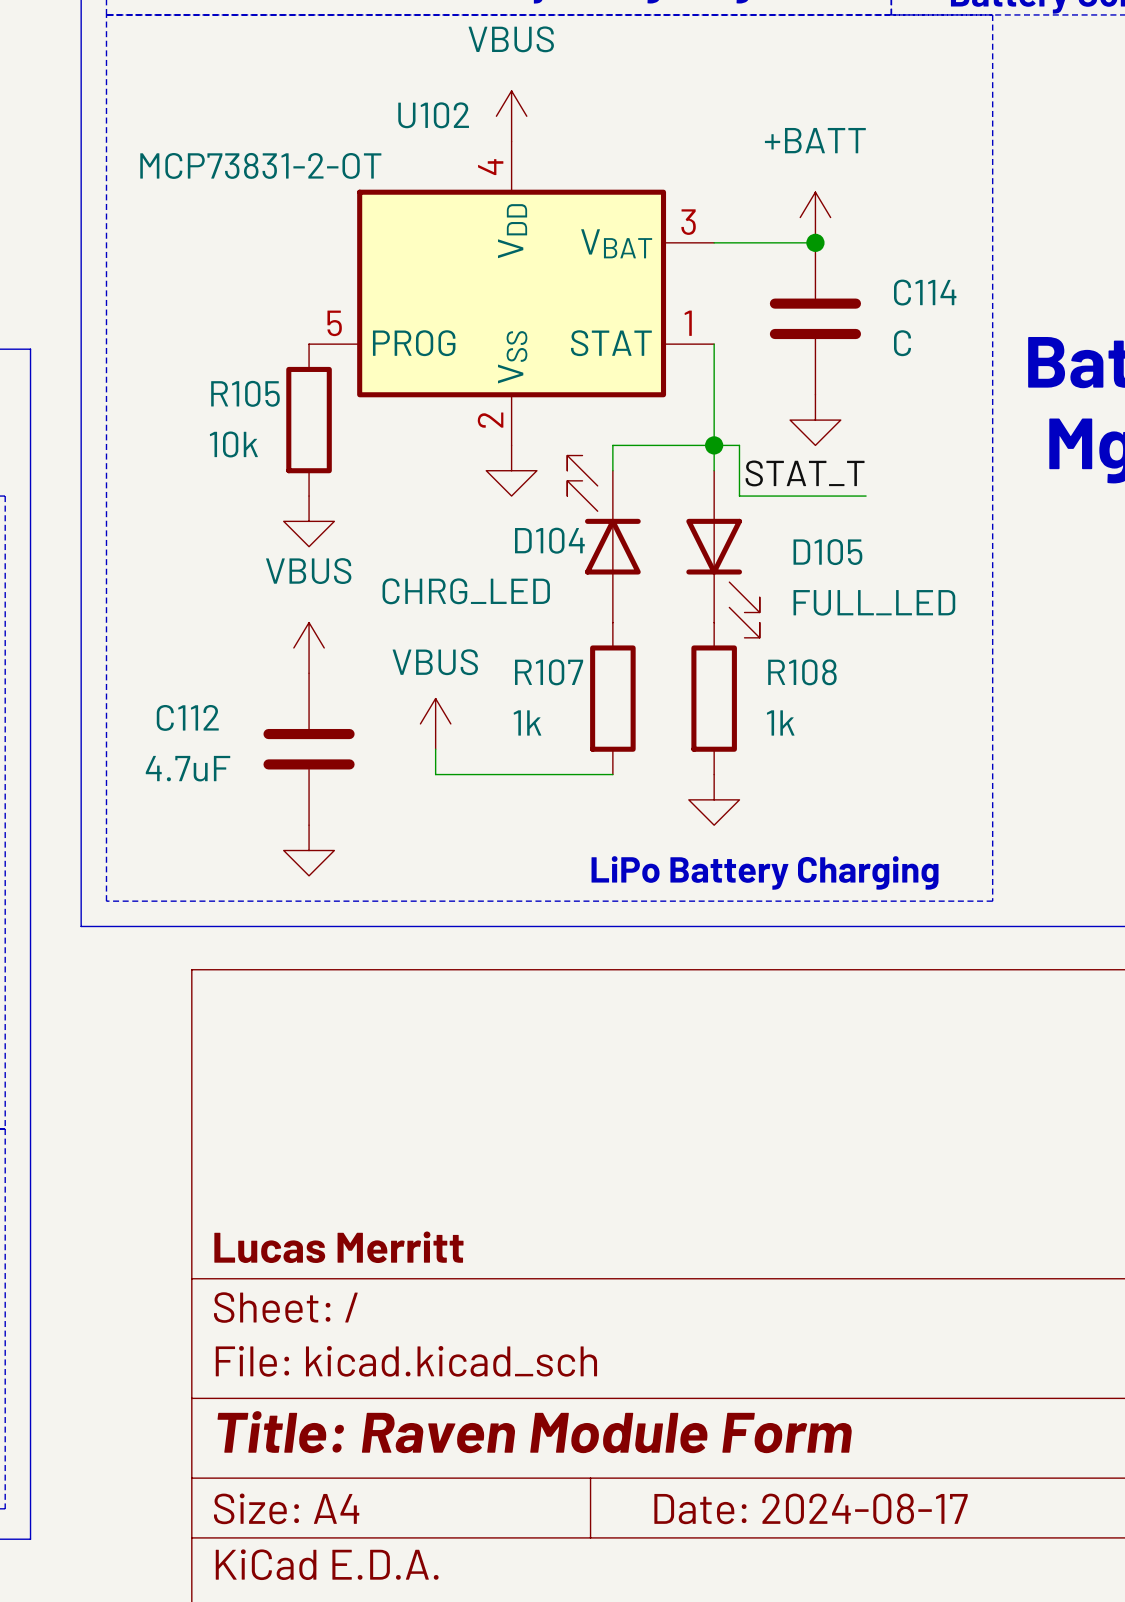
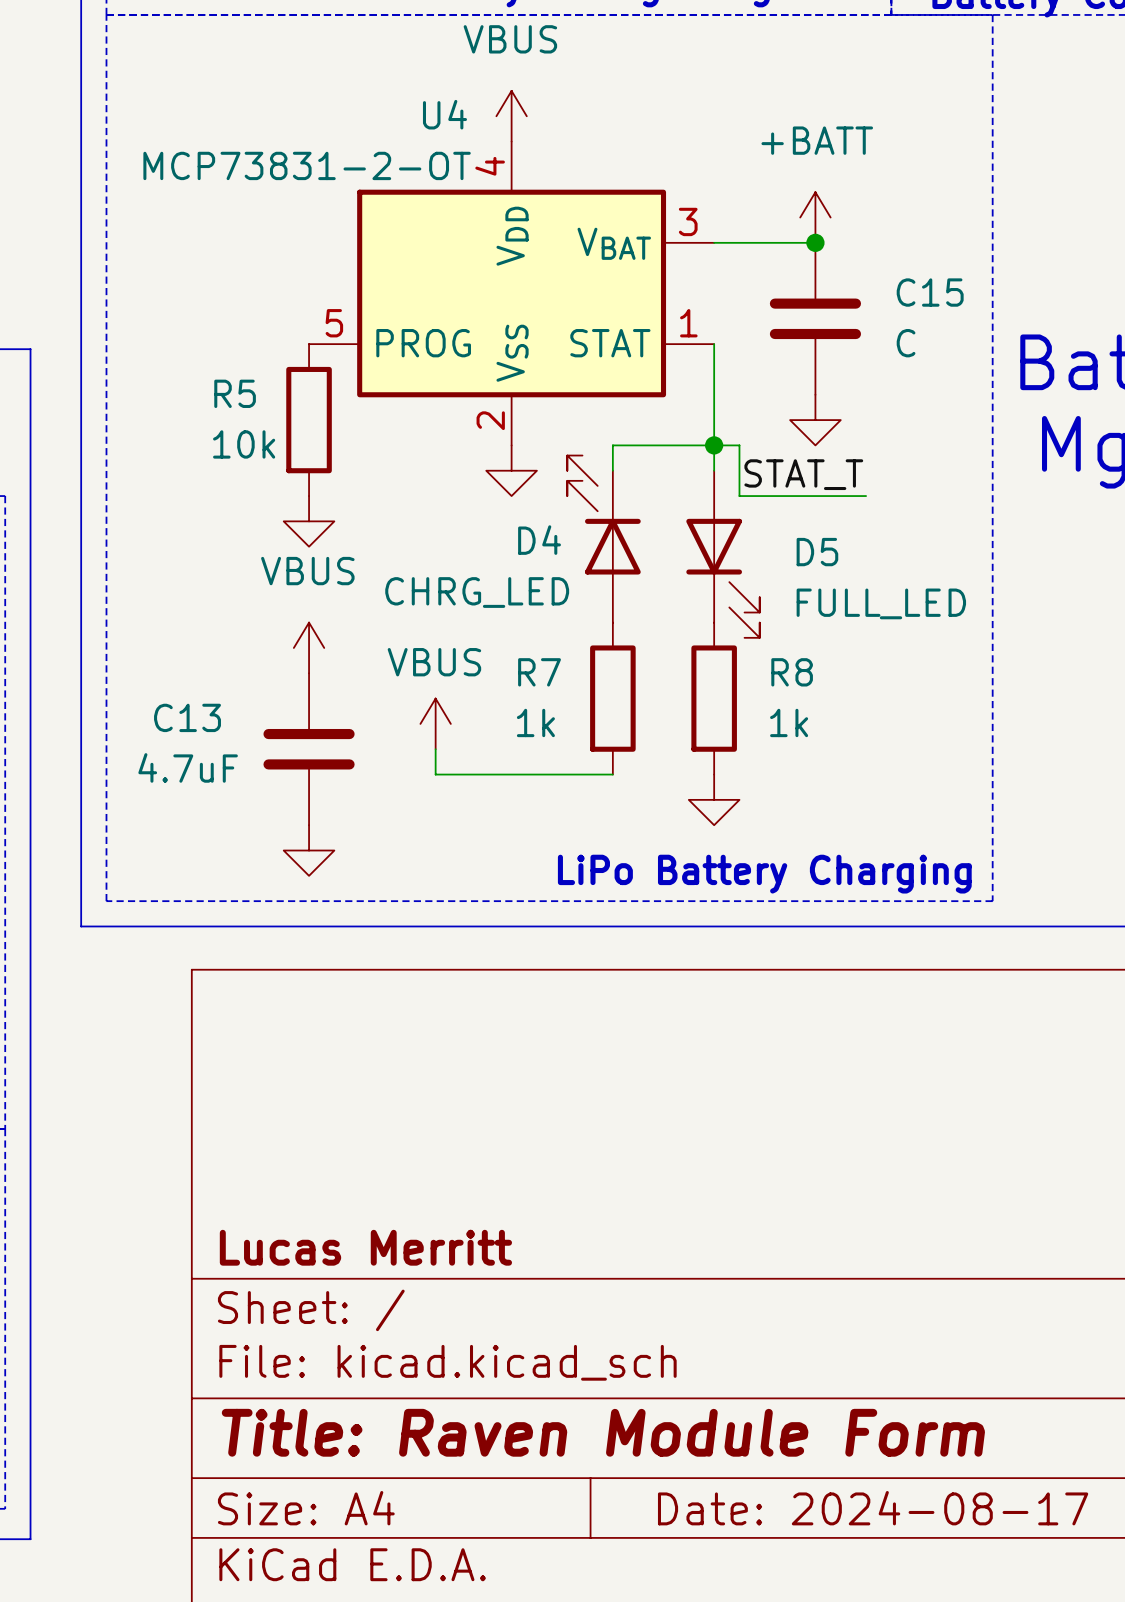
U102 name: U102 (433, 115) -> U4 (444, 114)
C114 name: C114 (925, 292) -> C15 (930, 292)
R105 name: R105 (245, 393) -> R5 (235, 393)
D104 name: D104 (549, 540) -> D4 (539, 540)
D105 name: D105 (827, 552) -> D5 (817, 552)
R107 name: R107 (549, 672) -> R7 (539, 672)
R108 name: R108 (802, 672) -> R8 (792, 672)
C112 name: C112 (187, 717) -> C13 (187, 717)

